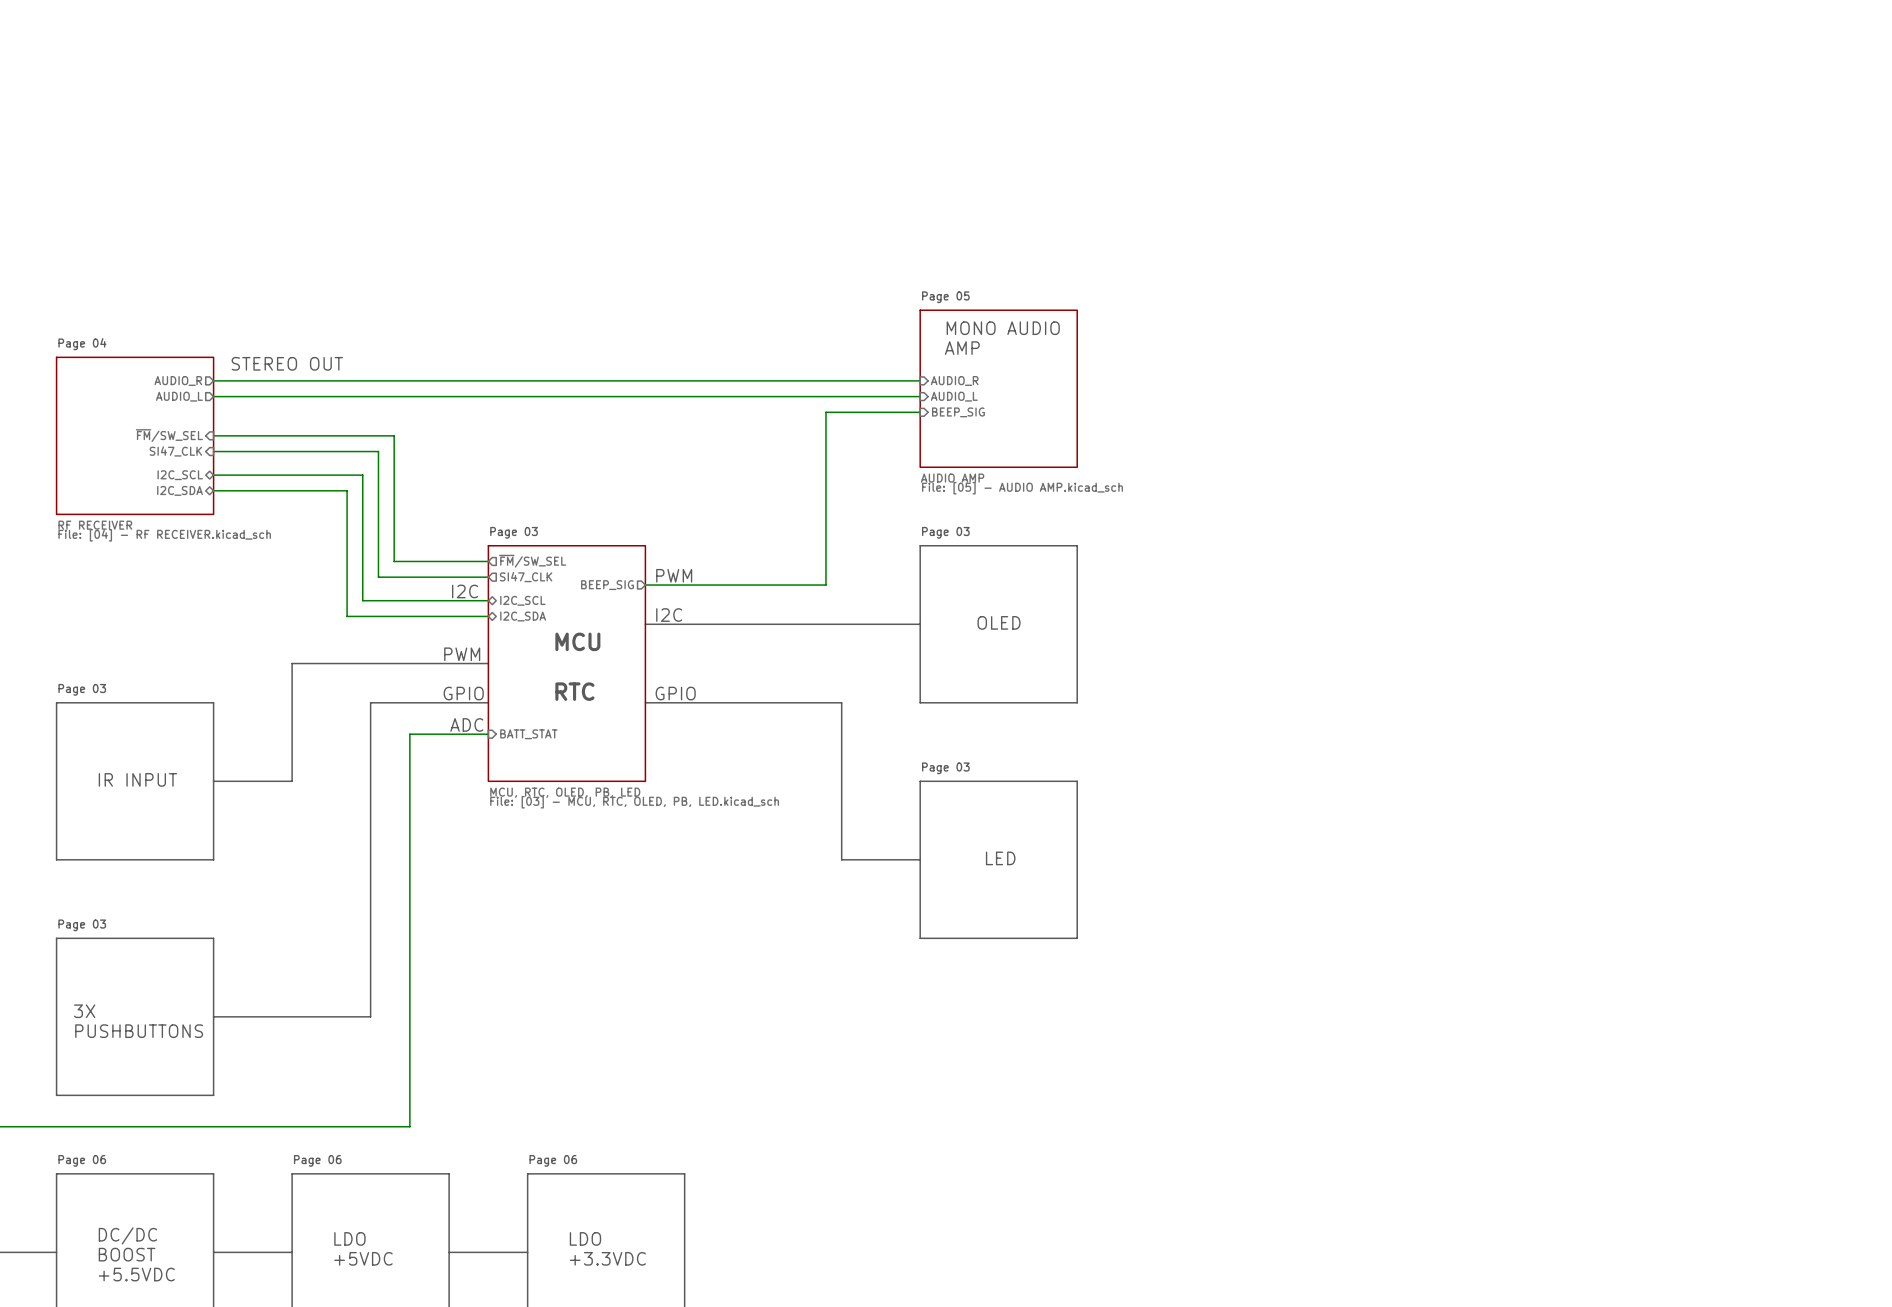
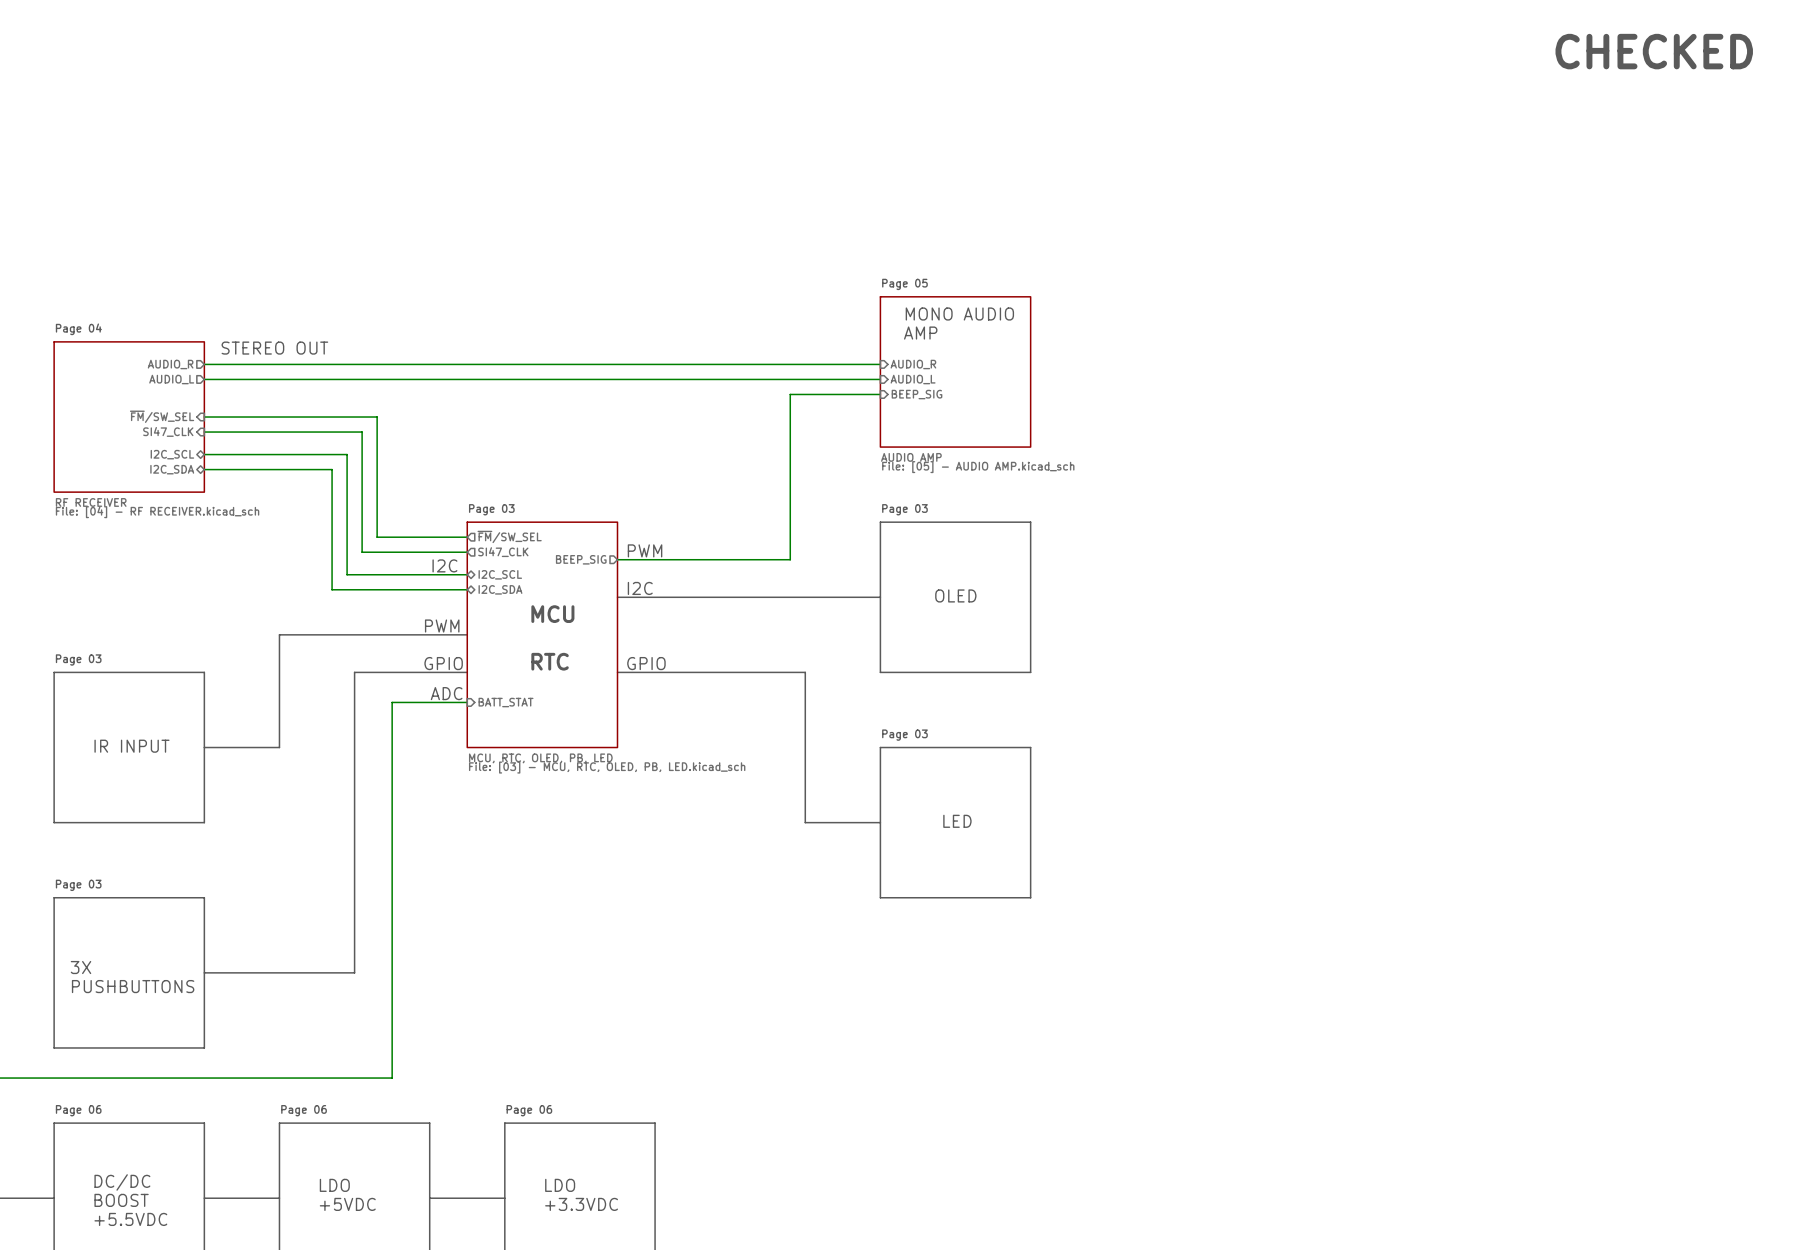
text: none -> CHECKED (1654, 51)

